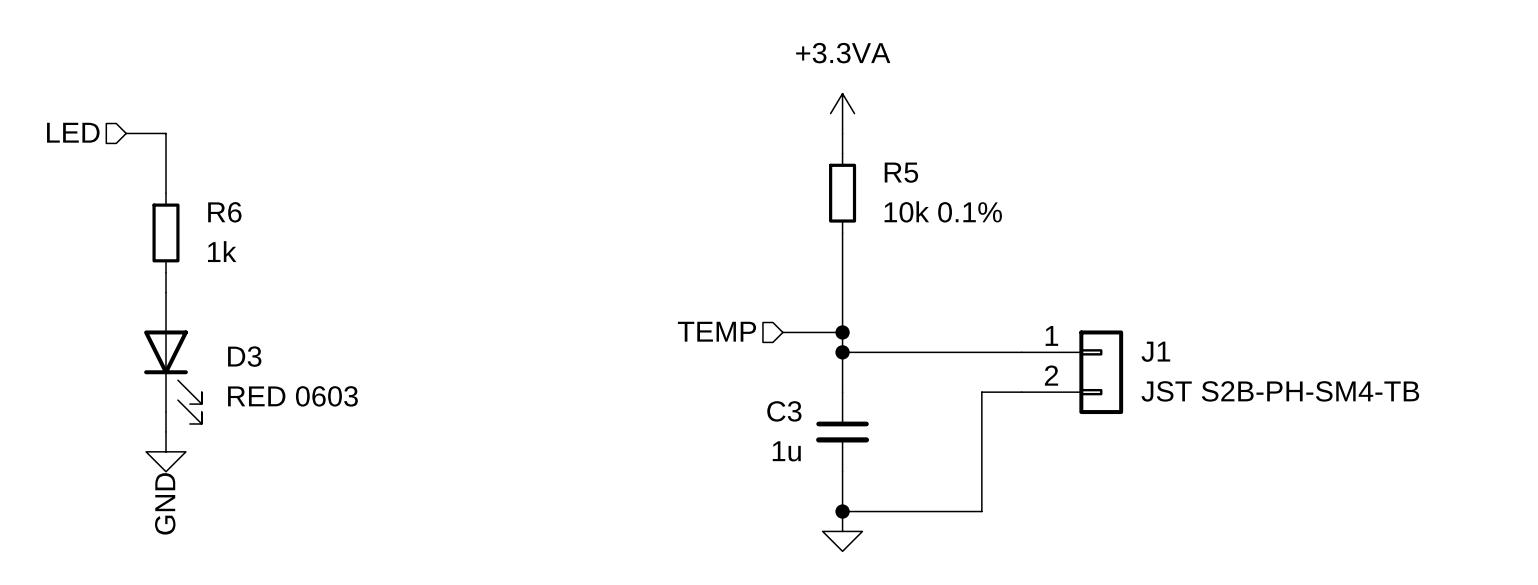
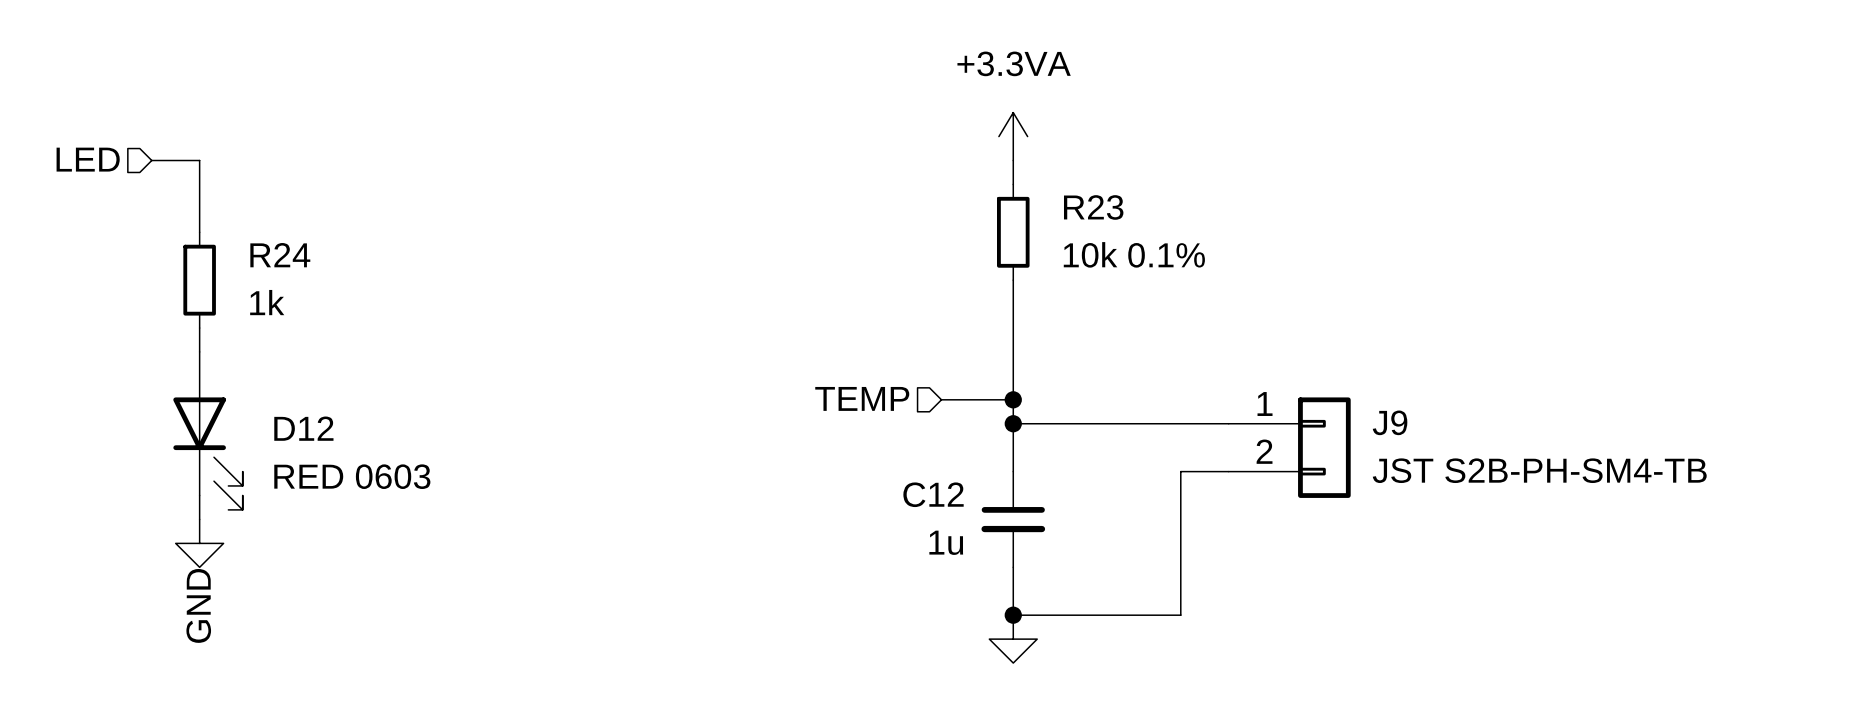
R5 name: R5 (901, 172) -> R23 (1093, 207)
R6 name: R6 (224, 212) -> R24 (280, 255)
J1 name: J1 (1155, 351) -> J9 (1390, 422)
D3 name: D3 (244, 356) -> D12 (303, 428)
C3 name: C3 (784, 411) -> C12 (933, 494)

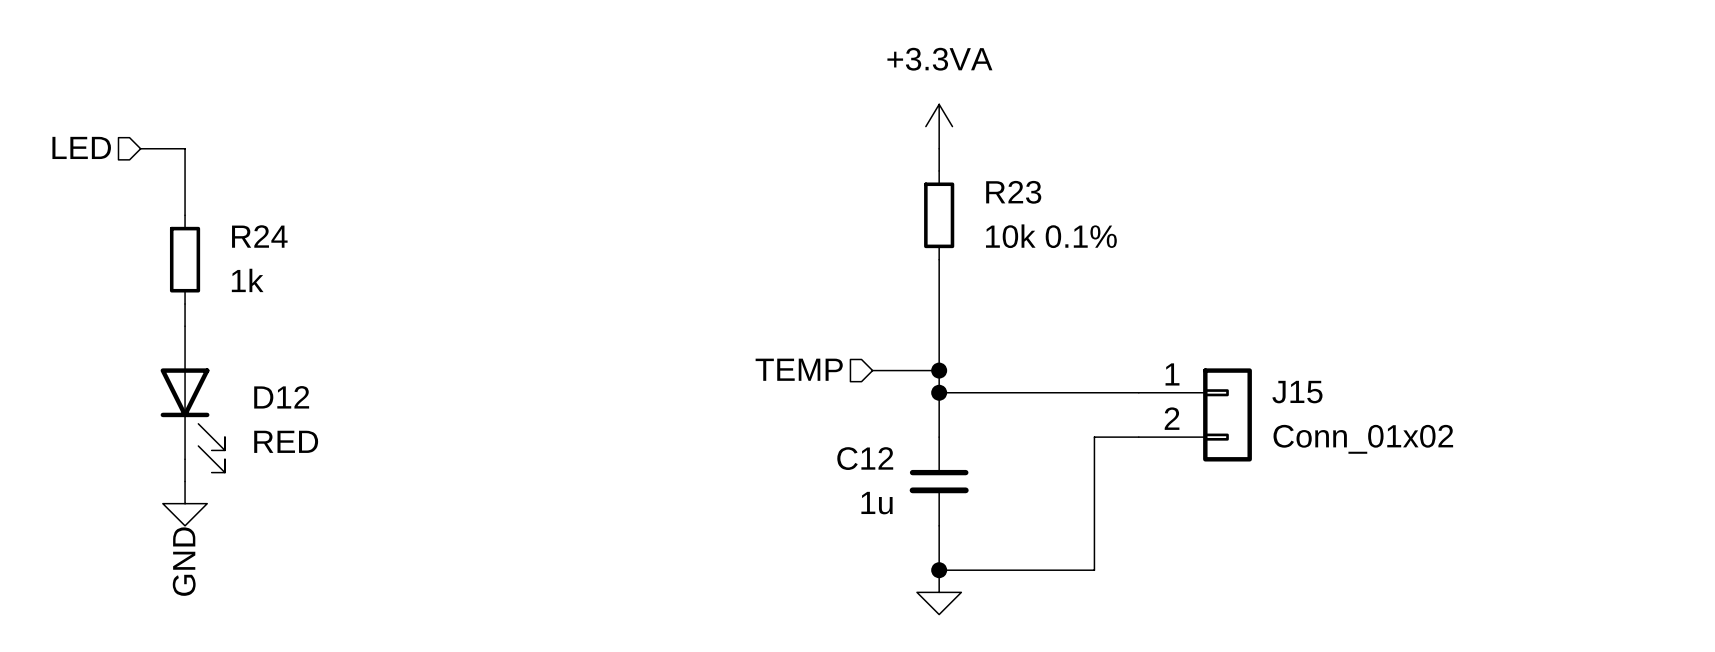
J9 name: J9 (1390, 422) -> J15 (1297, 392)
J9 value: JST S2B-PH-SM4-TB (1539, 470) -> Conn_01x02 (1363, 439)
D12 value: RED 0603 (352, 476) -> RED (286, 441)

